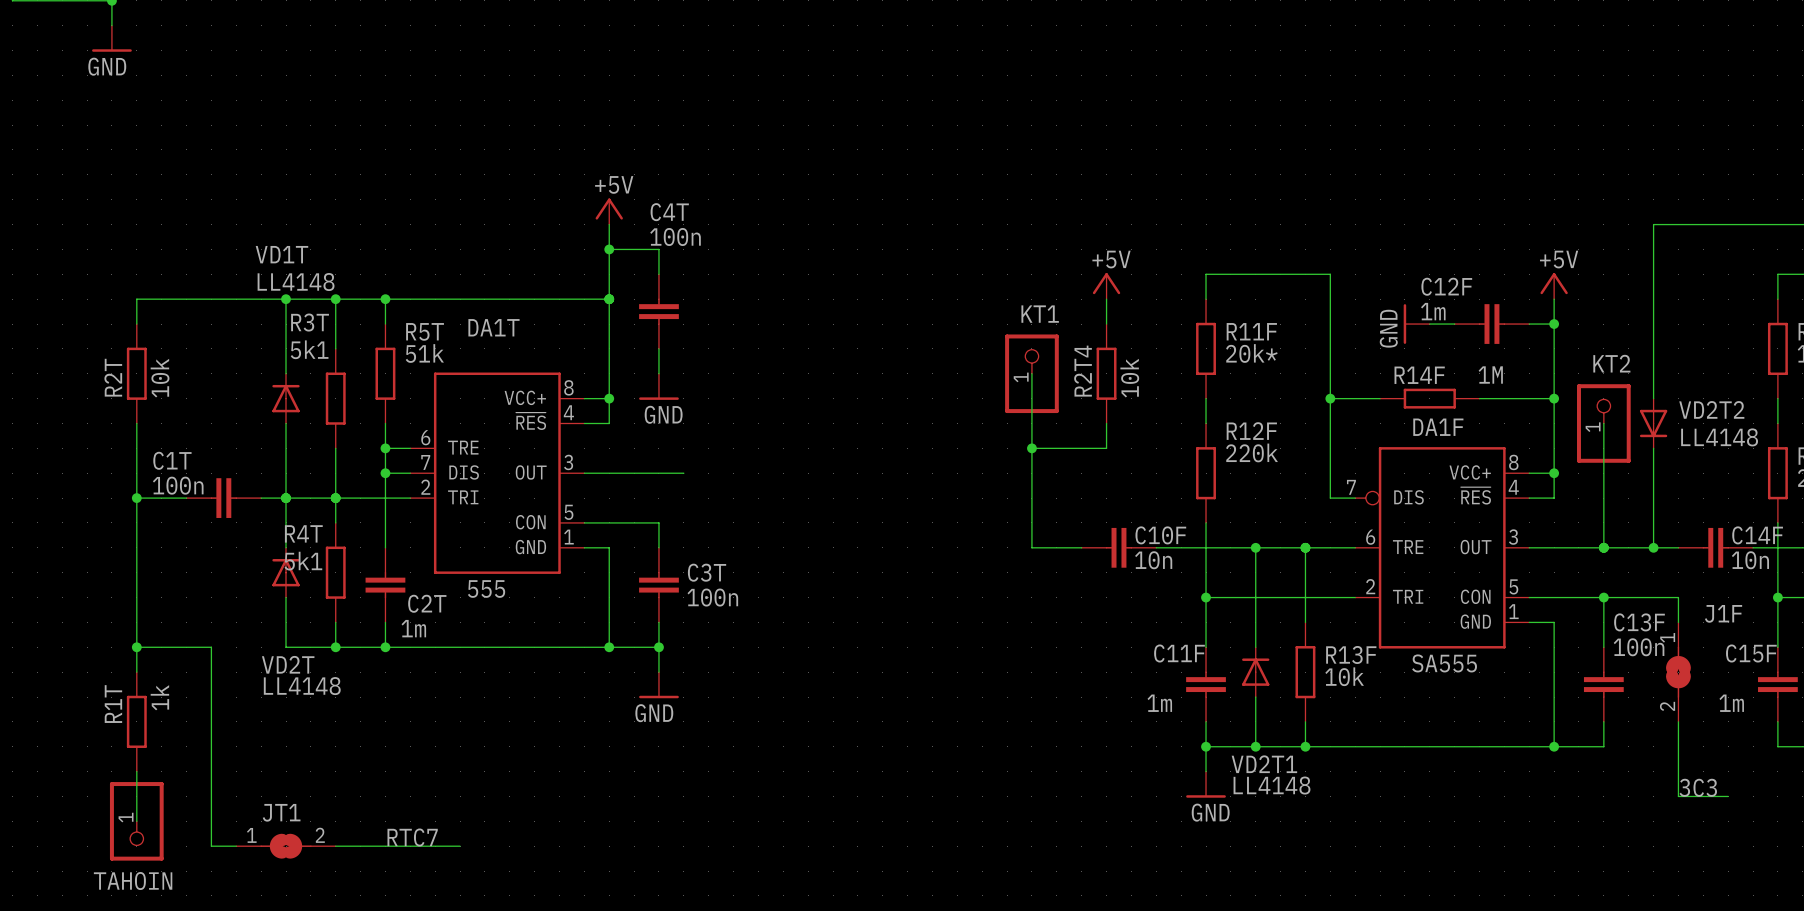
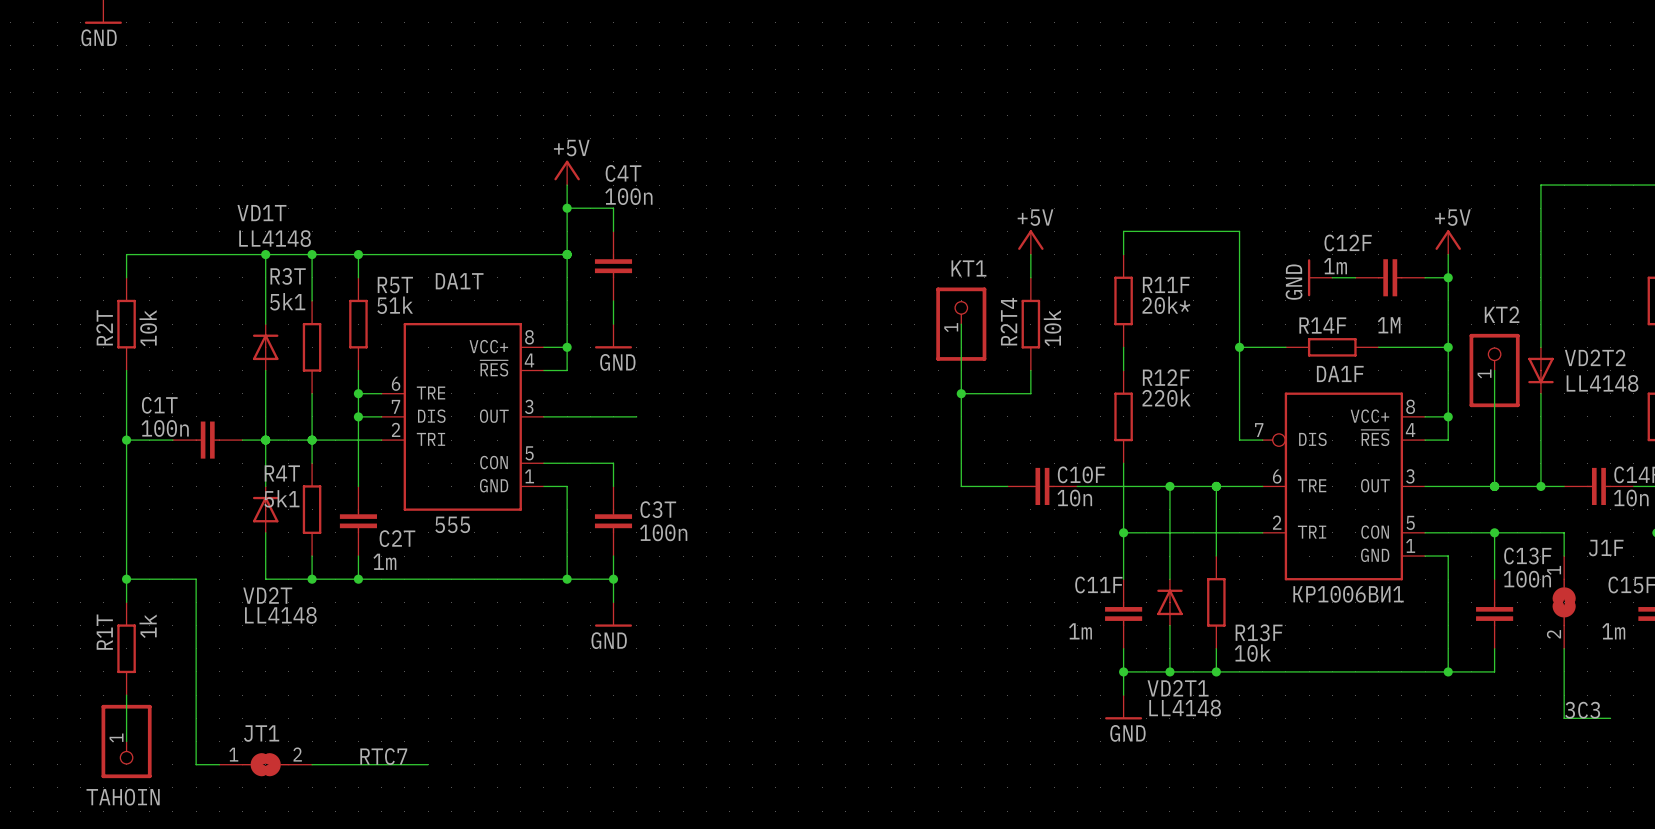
R13F name position: R13F (1351, 654) -> R13F (1259, 632)
DA1F value: SA555 (1444, 663) -> КР1006ВИ1 (1348, 594)
R13F value position: 10k (1344, 676) -> 10k (1252, 653)

